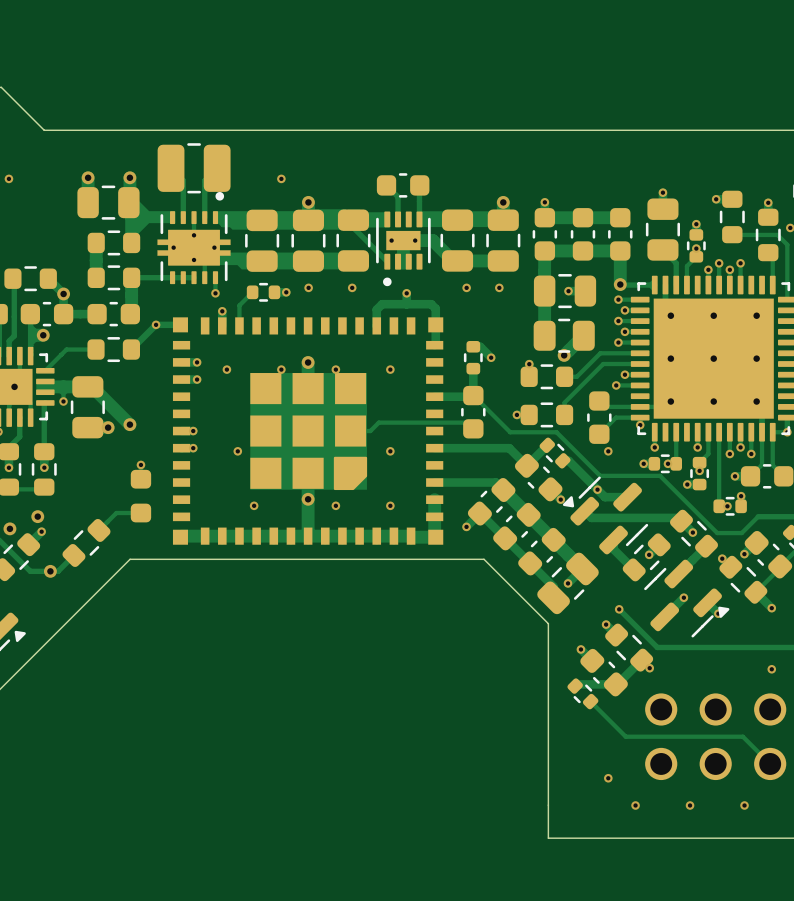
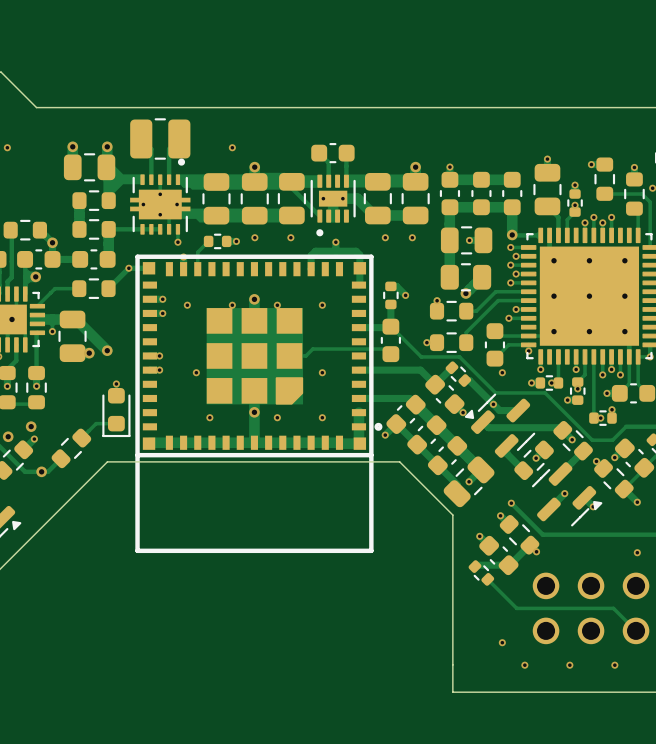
part footprint: [130, 469, 152, 523] -> [102, 388, 131, 438]
part: none -> (258, 403)

